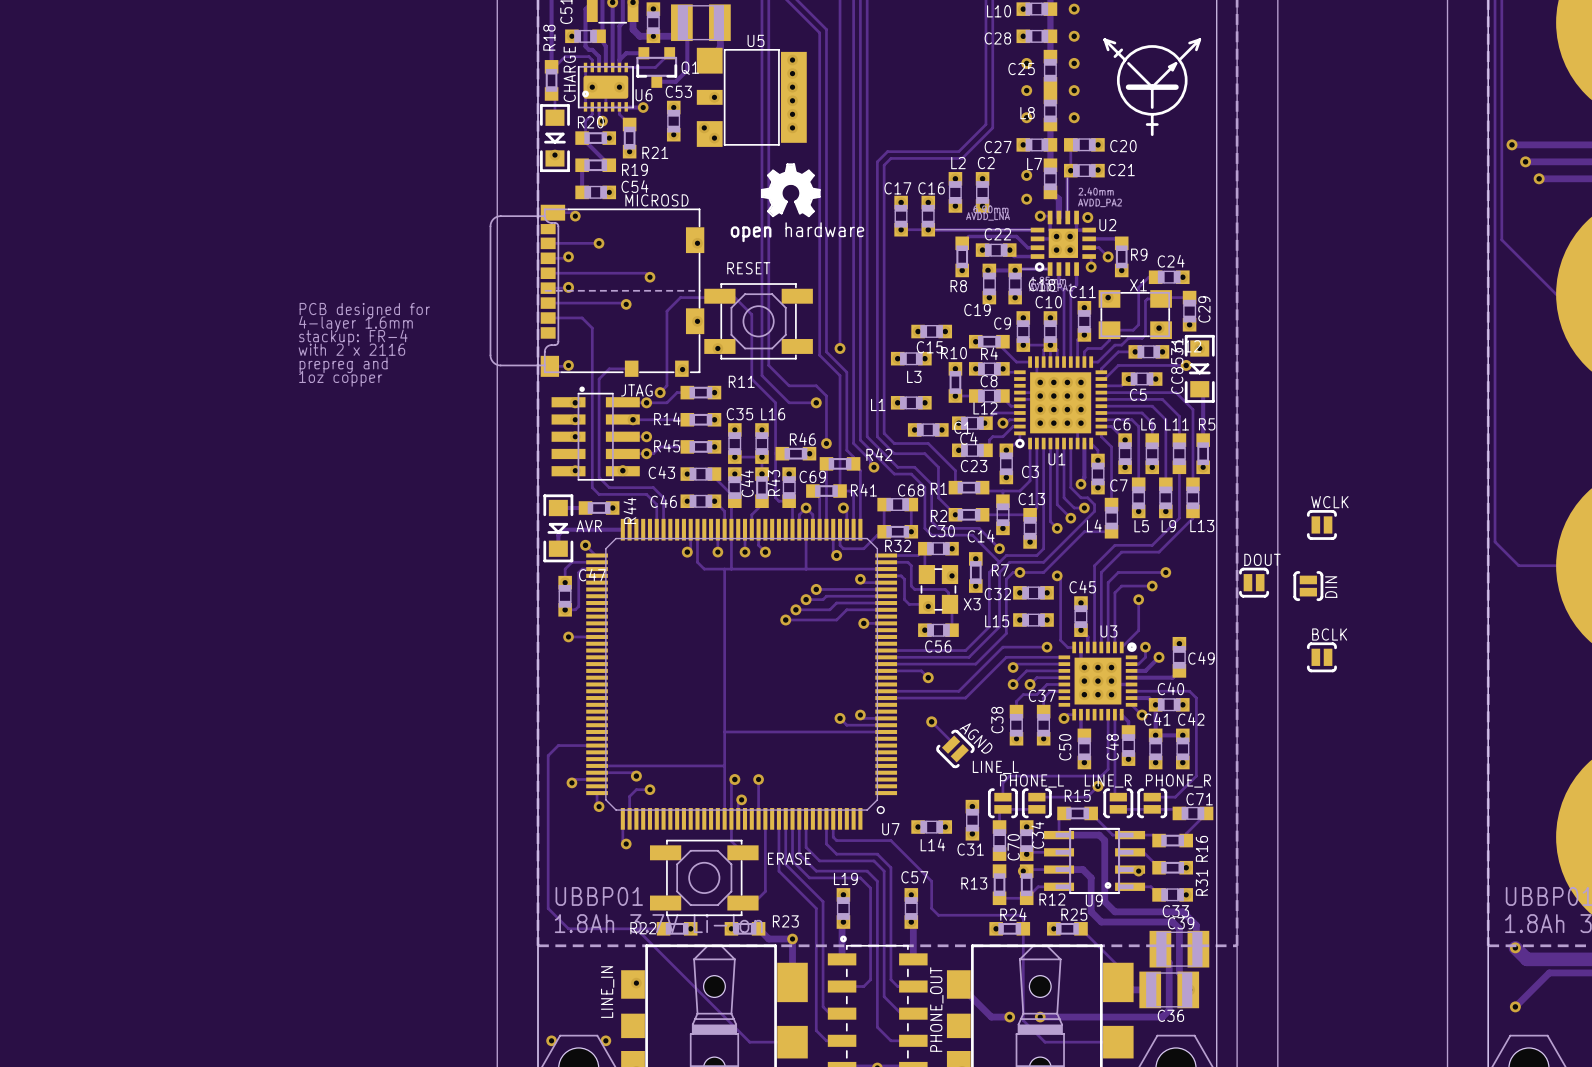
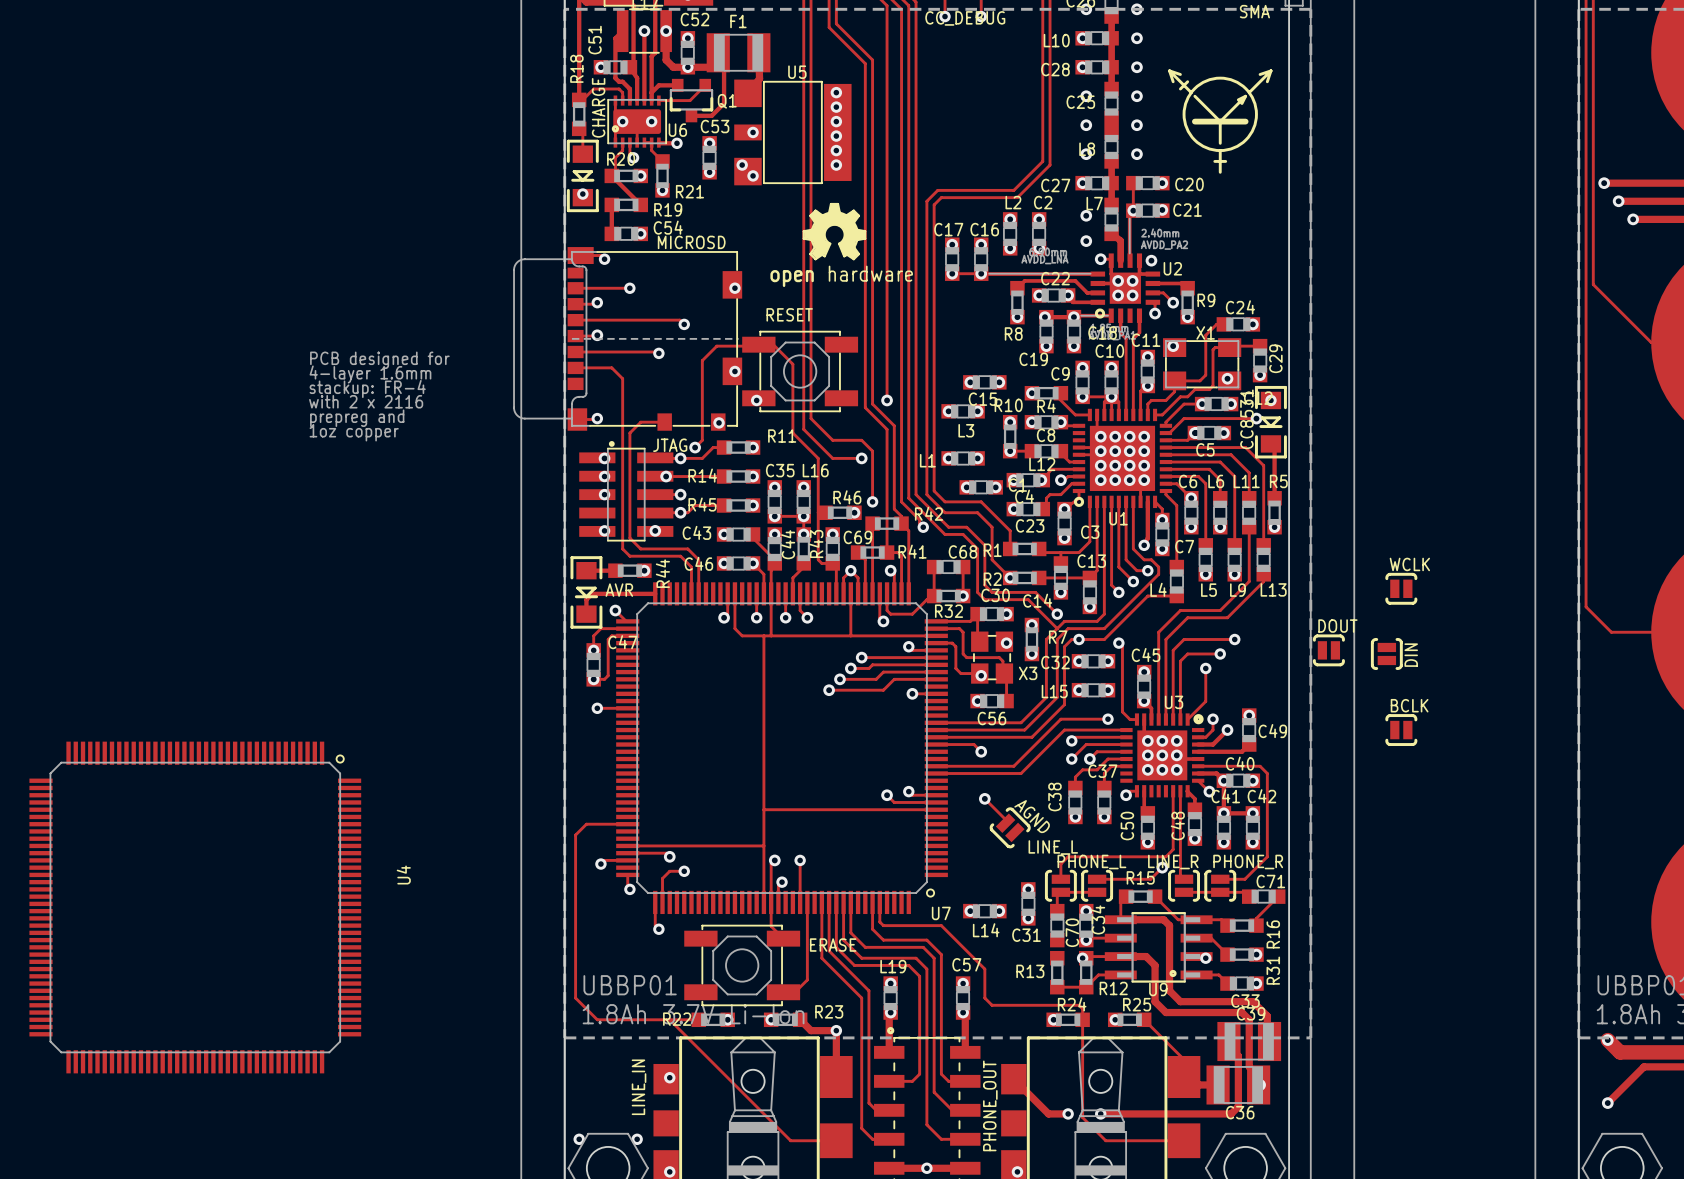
U4: none -> (195, 907)

